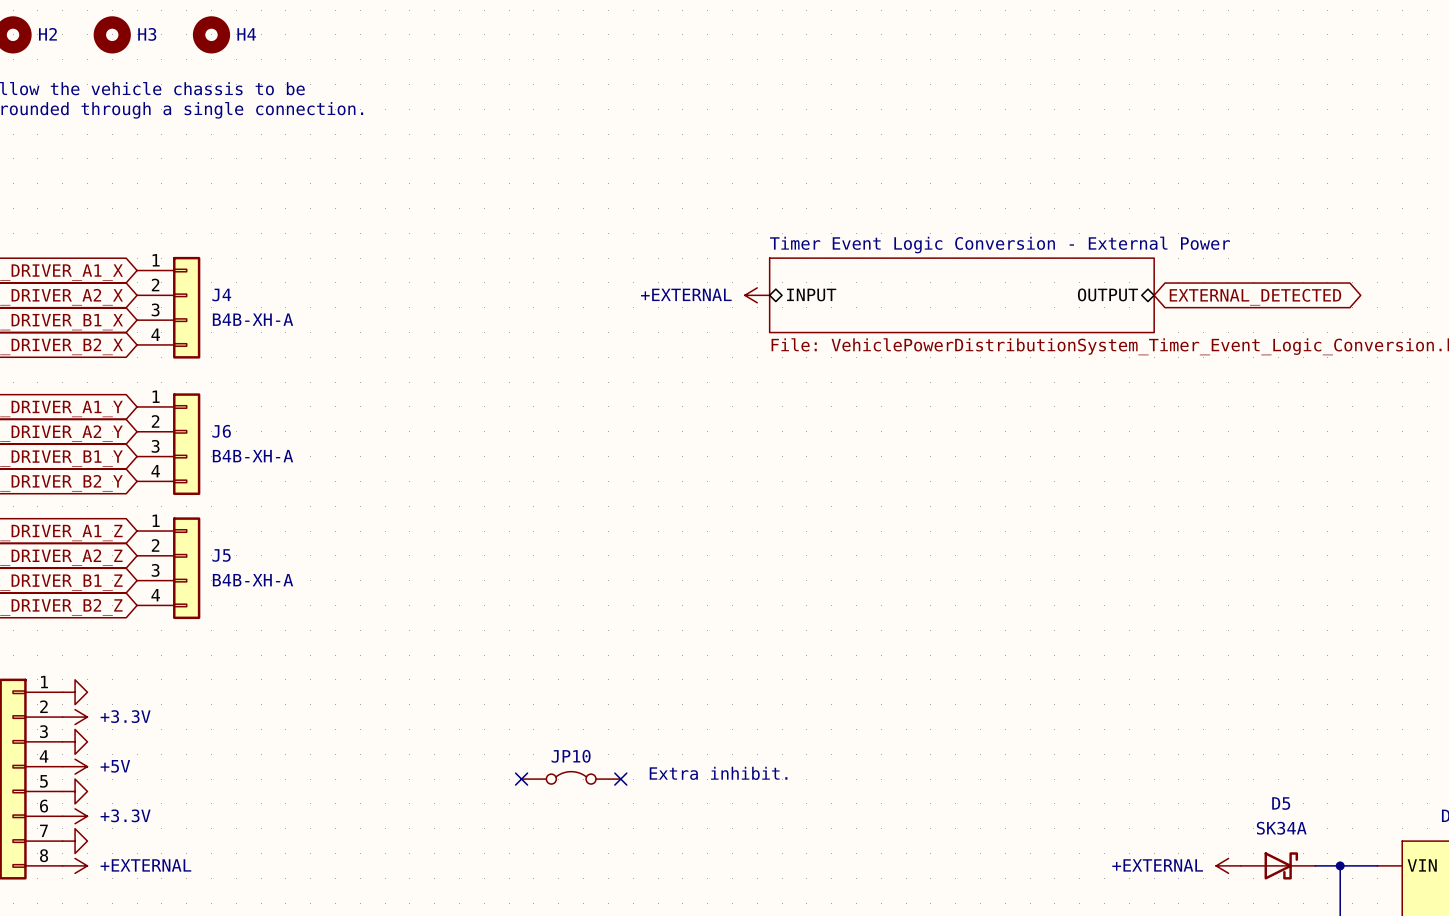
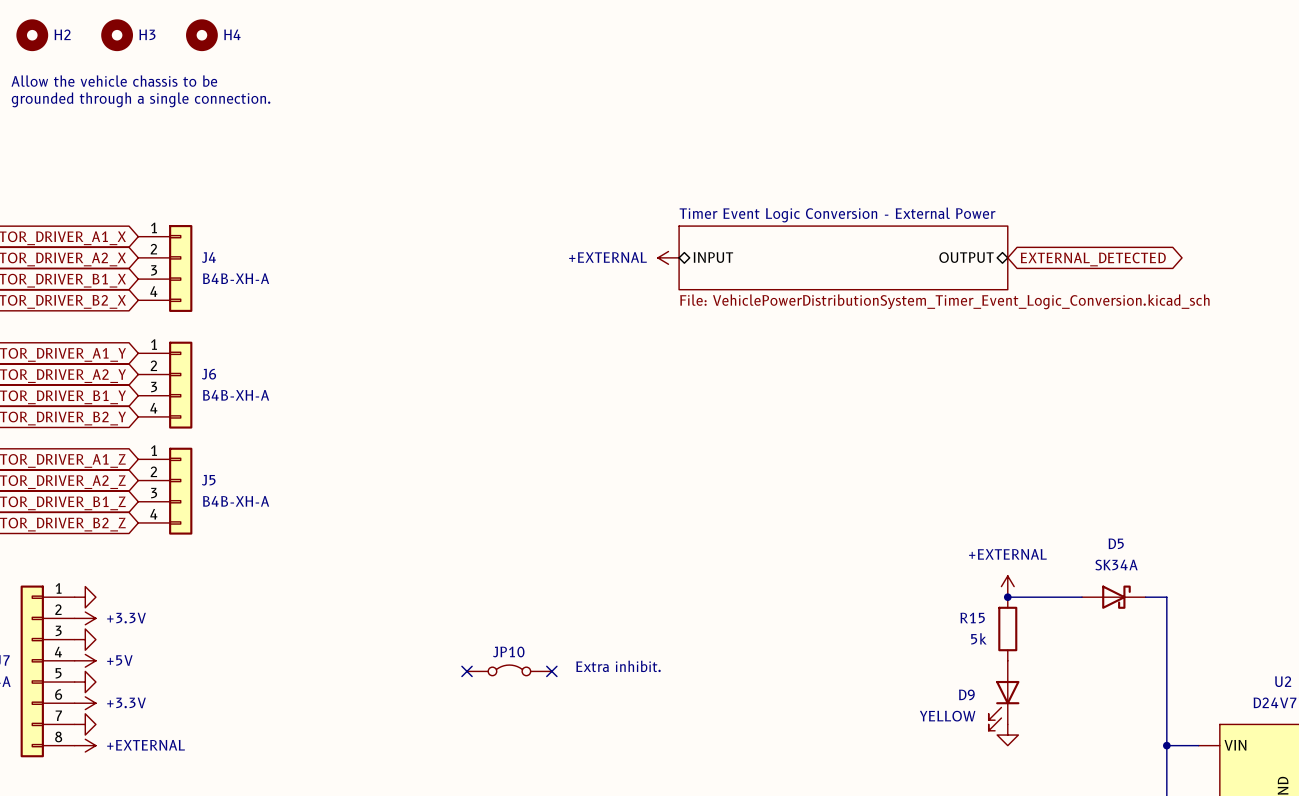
wire: none -> (1007, 597) (1082, 597)
junction: none -> (1007, 597)
R15: none -> 5k (1007, 629)
D9: none -> YELLOW (1004, 695)
power symbol: none -> (1007, 735)
power symbol text position: +EXTERNAL (1157, 865) -> +EXTERNAL (1007, 554)
power symbol rotation: 0° (1228, 865) -> 90° clockwise (1007, 586)
power symbol position: +EXTERNAL (1228, 865) -> +EXTERNAL (1007, 586)
D5 position: (1278, 865) -> (1113, 597)
wire: (1315, 865) (1340, 865) -> (1145, 597) (1166, 597) (1166, 745)

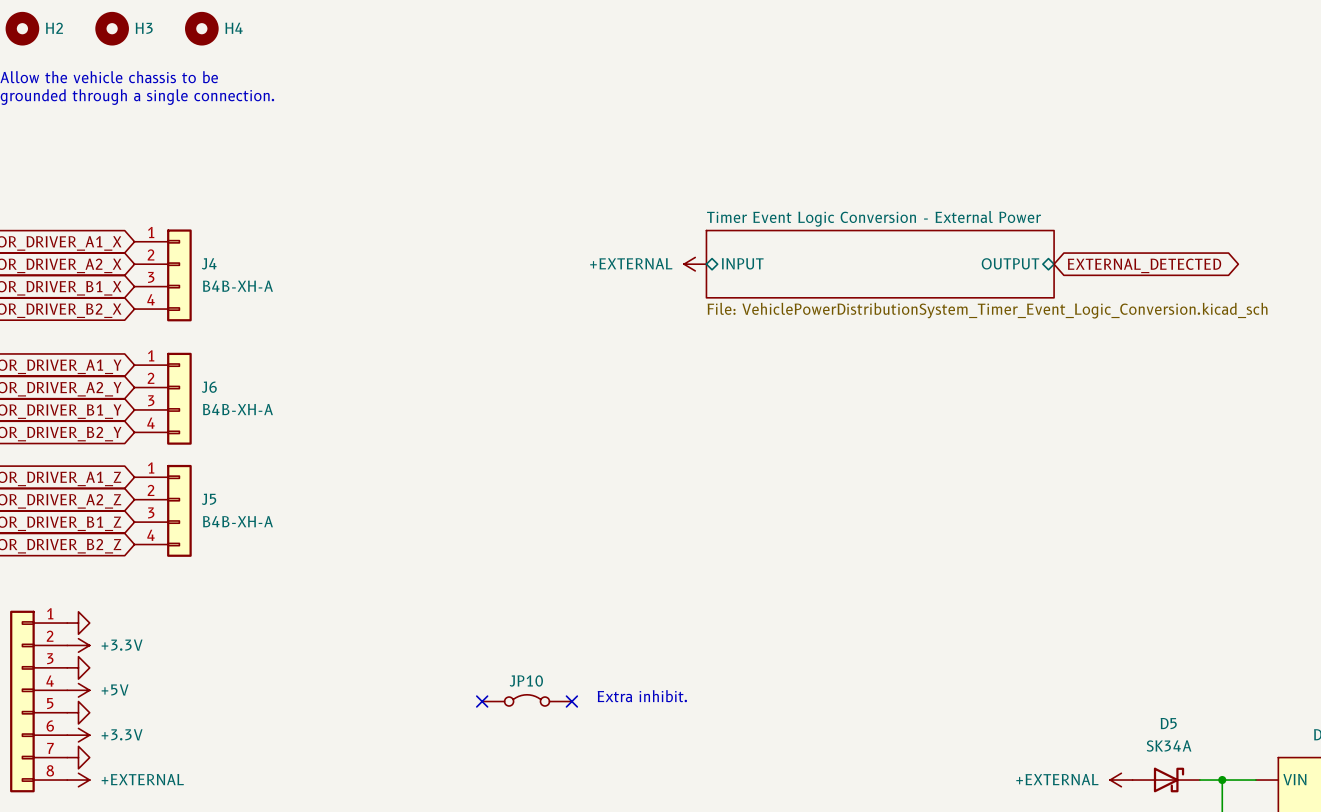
power symbol text position: +EXTERNAL (1007, 554) -> +EXTERNAL (1057, 779)
power symbol rotation: 0° (1007, 586) -> 90° counterclockwise (1121, 780)
power symbol position: +EXTERNAL (1007, 586) -> +EXTERNAL (1121, 780)
wire: (1007, 597) (1082, 597) -> none
junction: (1007, 597) -> none
D5 position: (1113, 597) -> (1166, 780)
wire: (1145, 597) (1166, 597) (1166, 745) -> (1199, 780) (1222, 780)
R15: 5k (1007, 629) -> none
D9: YELLOW (1004, 695) -> none
power symbol: (1007, 735) -> none

